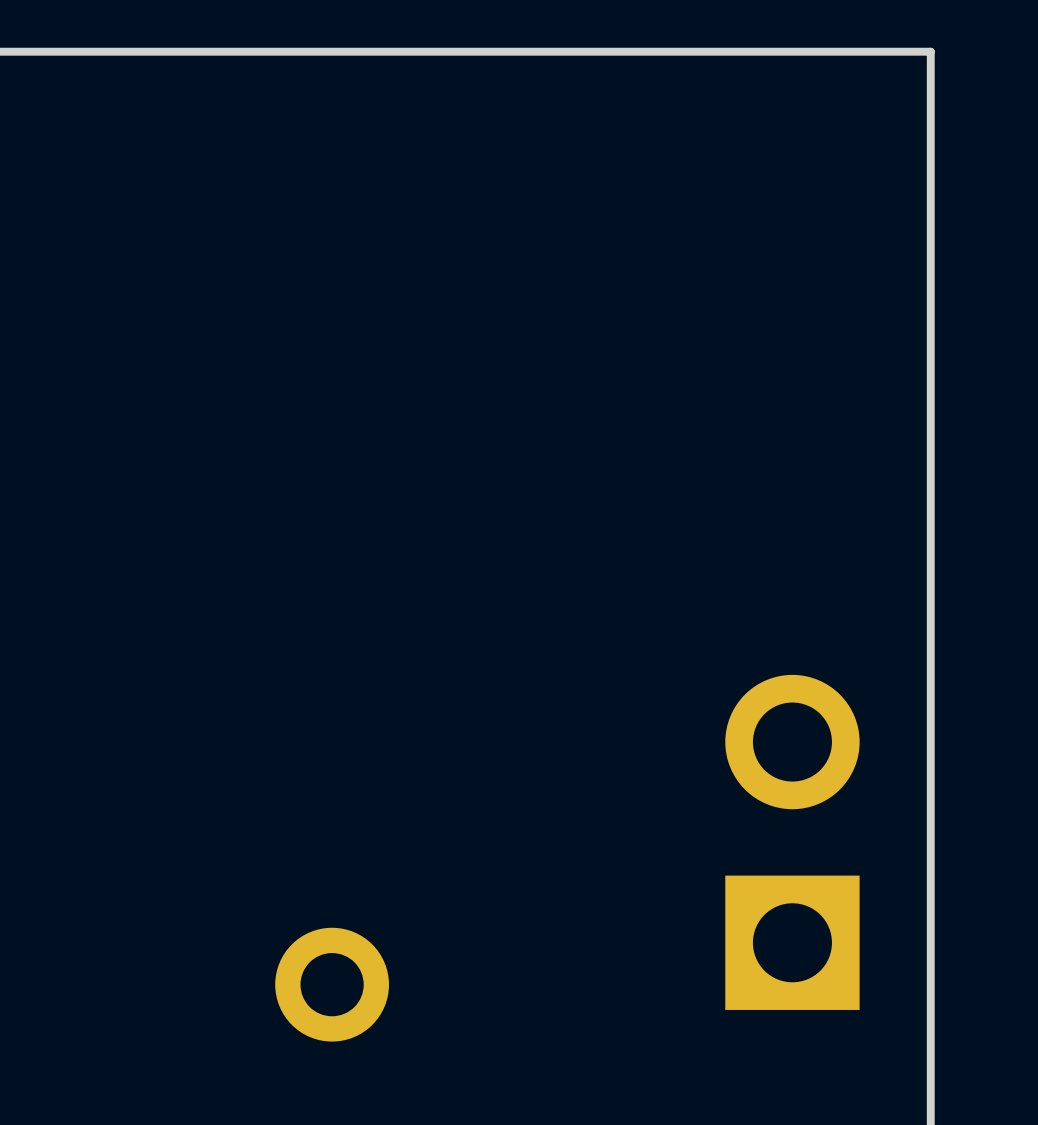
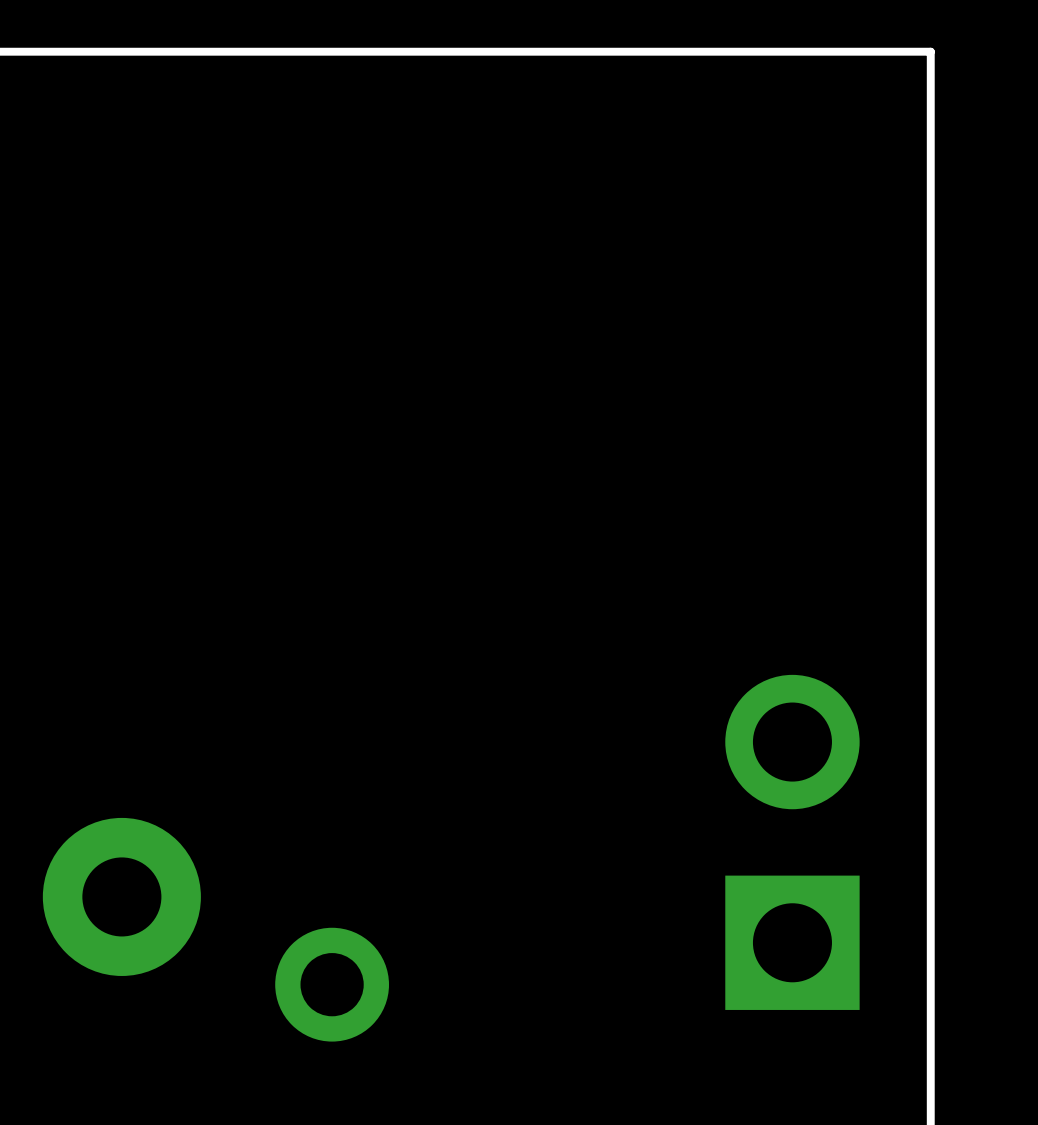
part: none -> (121, 896)

